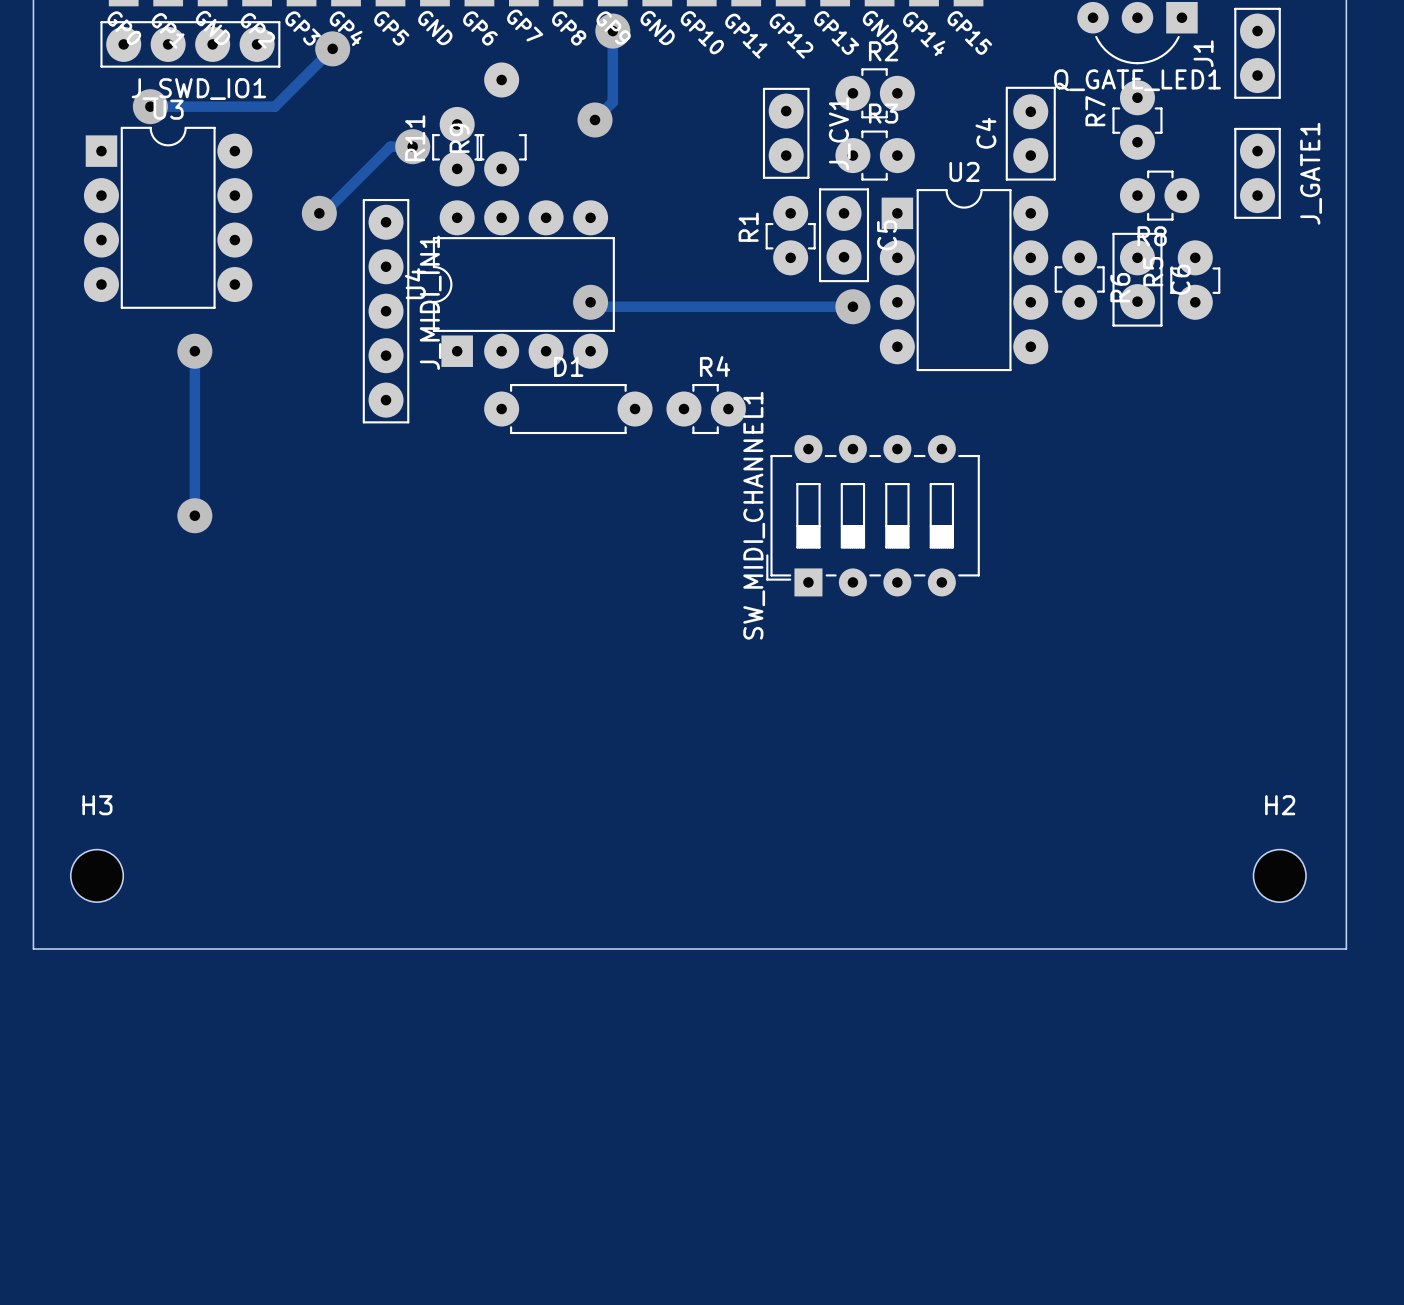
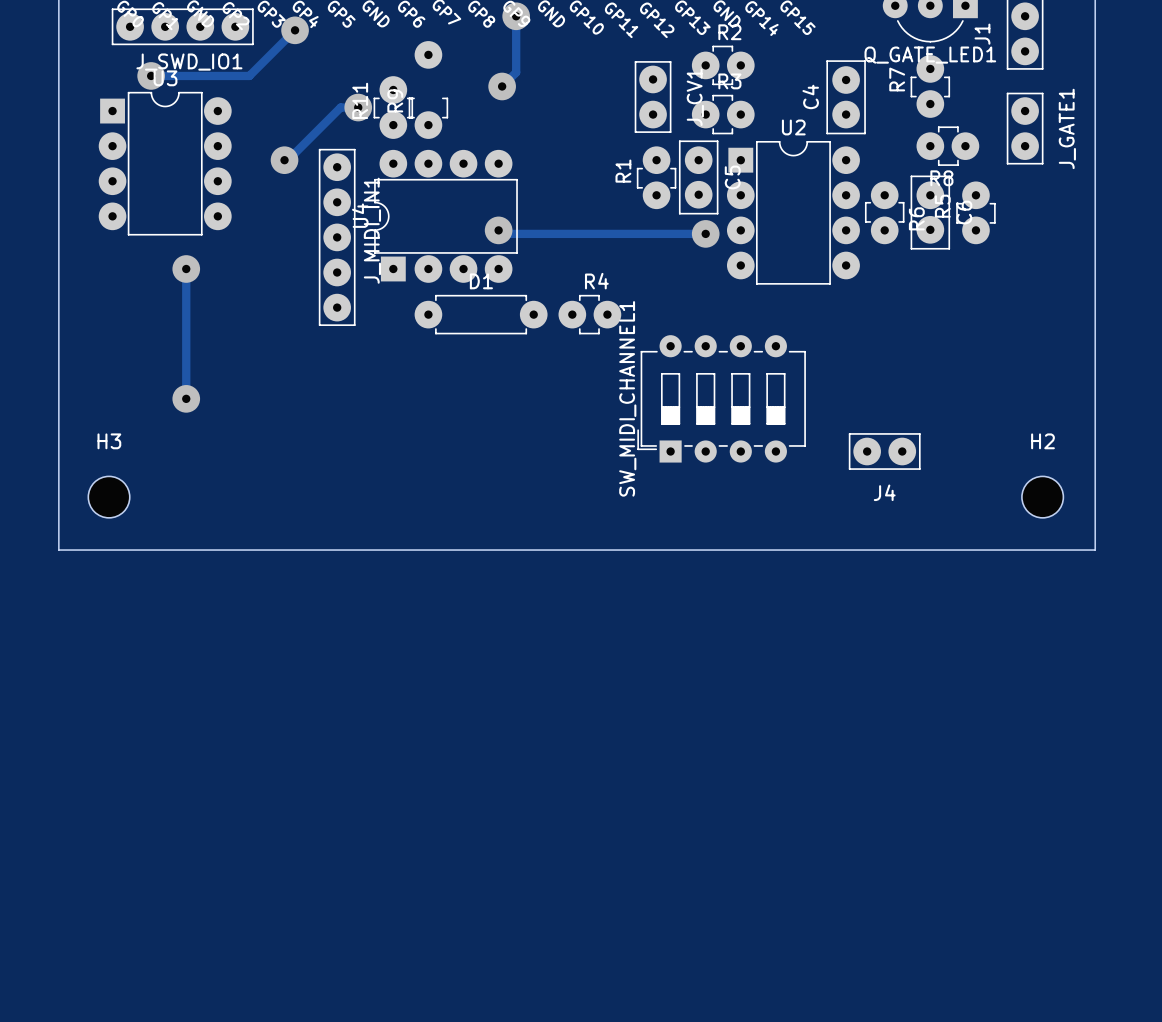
J4: none -> (884, 451)
board edge: (33, 707) (33, 948) (1346, 948) (1346, 707) -> (58, 550) (1095, 550)
H3 position: (97, 875) -> (109, 497)
H2 position: (1279, 875) -> (1042, 497)

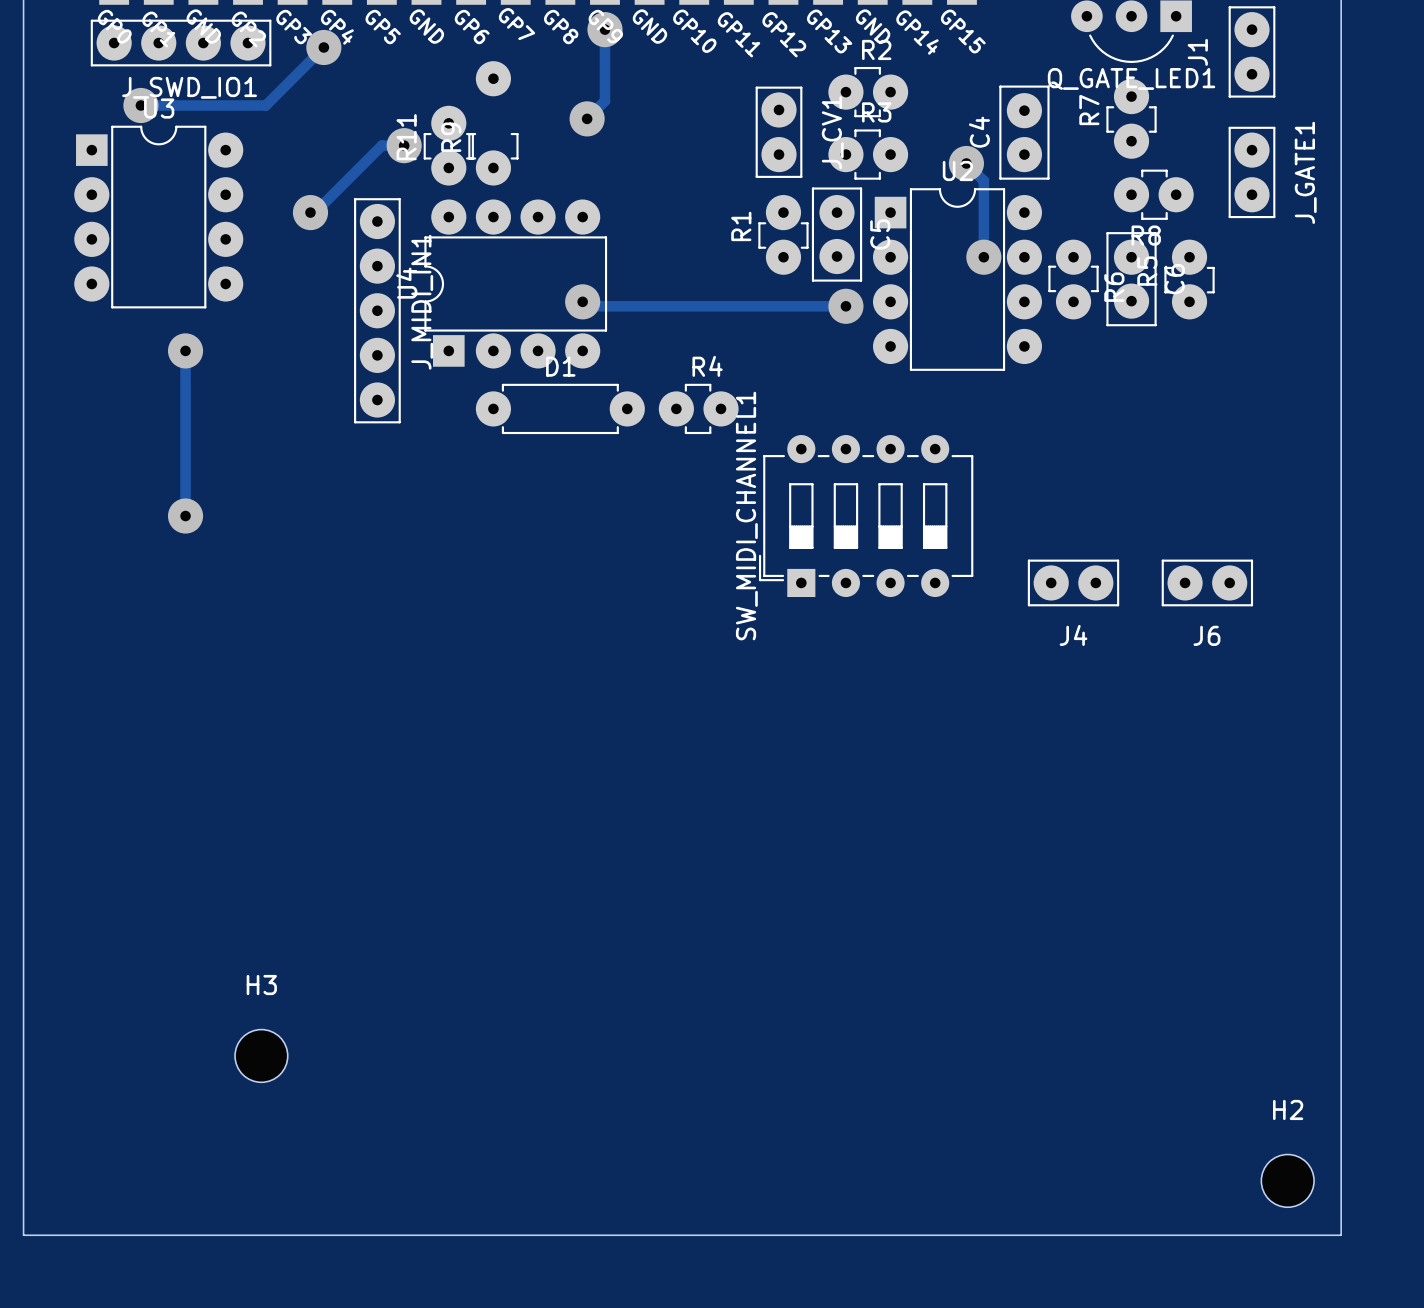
track: none -> (966, 163) (983, 180) (983, 257)
via: none -> (966, 163)
via: none -> (983, 257)
J6: none -> (1207, 582)
H3 position: (109, 497) -> (261, 1055)
H2 position: (1042, 497) -> (1287, 1180)
board edge: (58, 550) (1095, 550) -> (23, 708) (23, 1235) (1341, 1235) (1341, 708)

